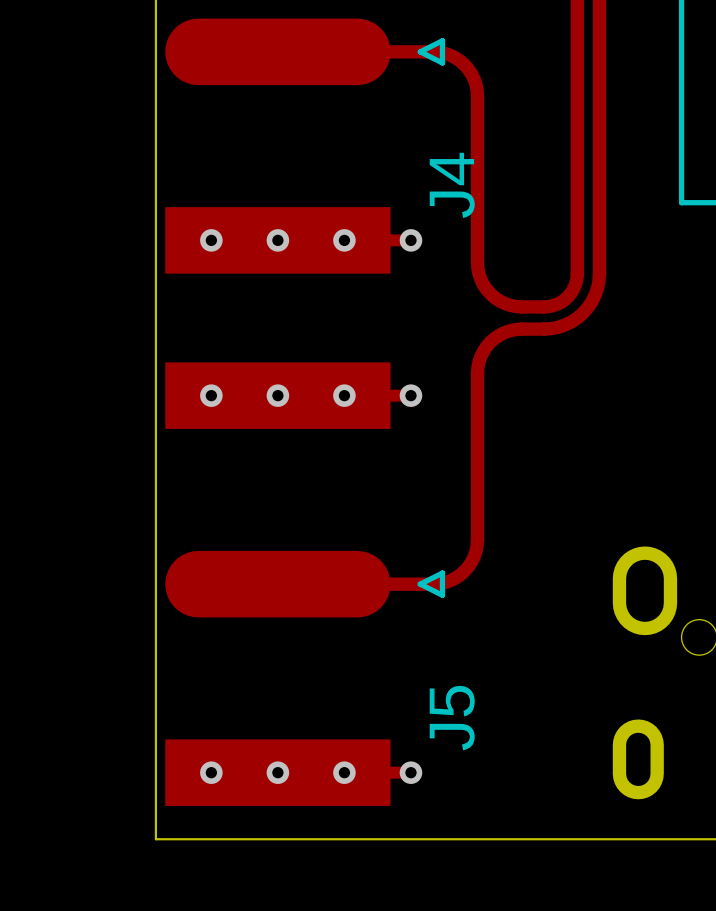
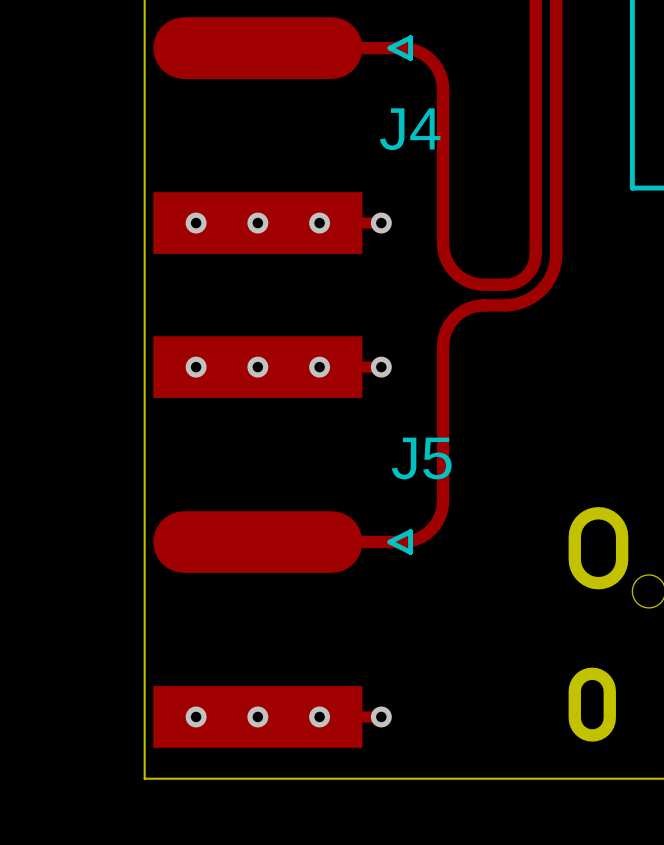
J4 name rotation: 0° (452, 185) -> 90° clockwise (410, 129)
J5 name rotation: 0° (452, 718) -> 90° clockwise (421, 458)
J5 name position: J5 (452, 718) -> J5 (421, 458)

